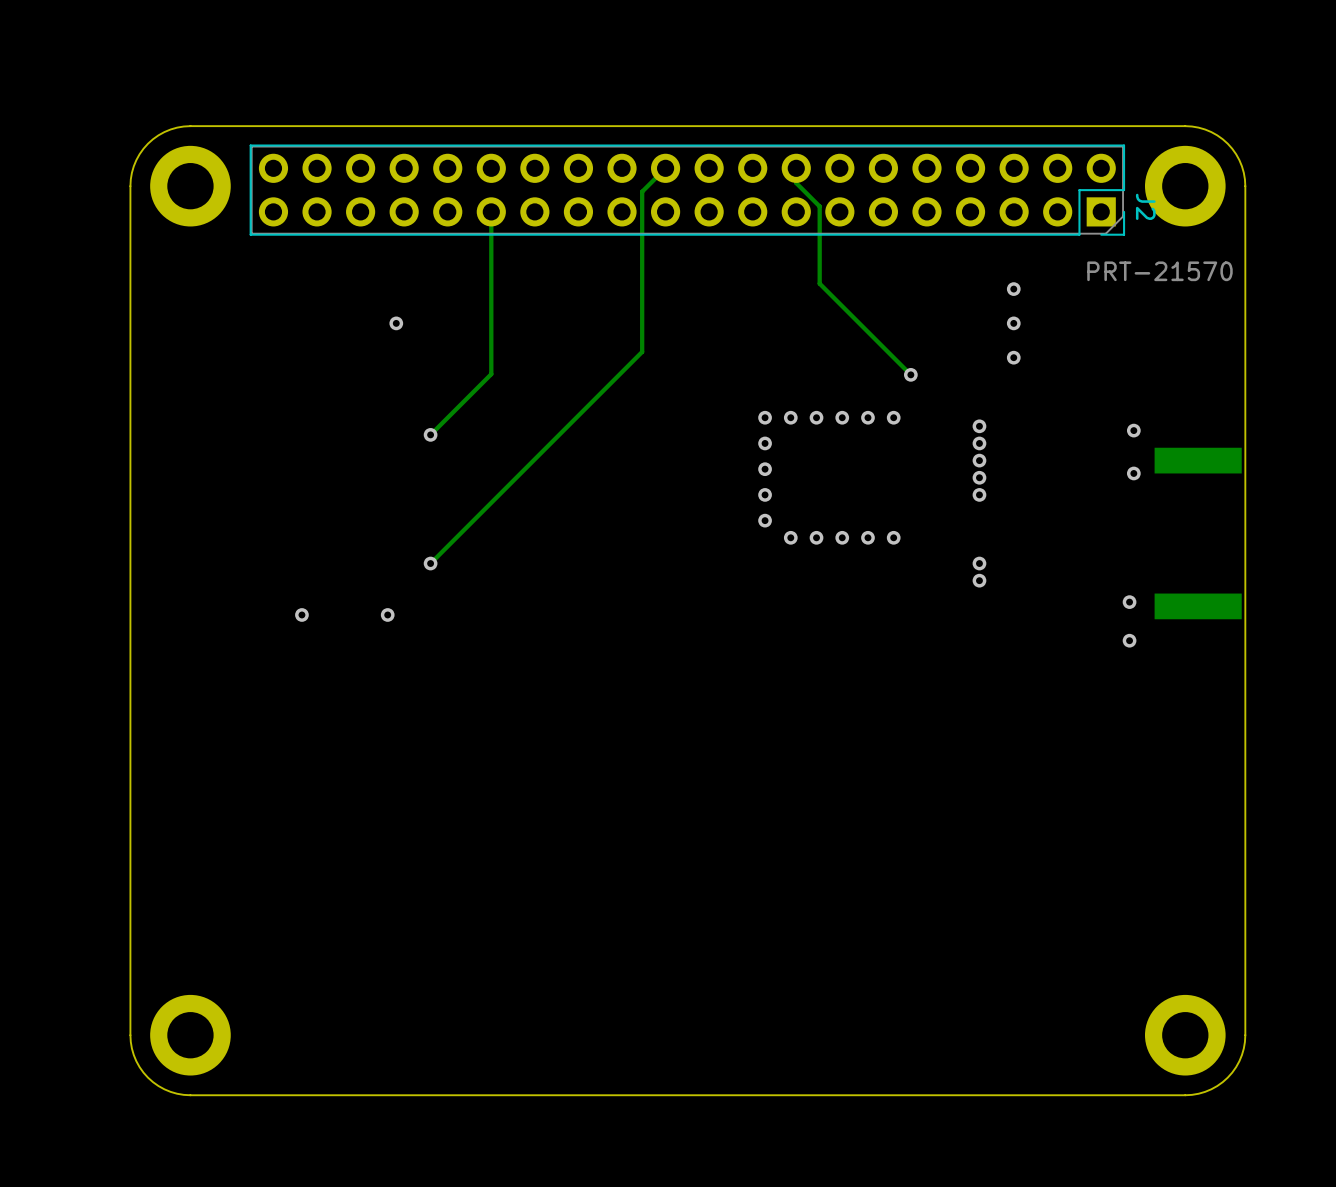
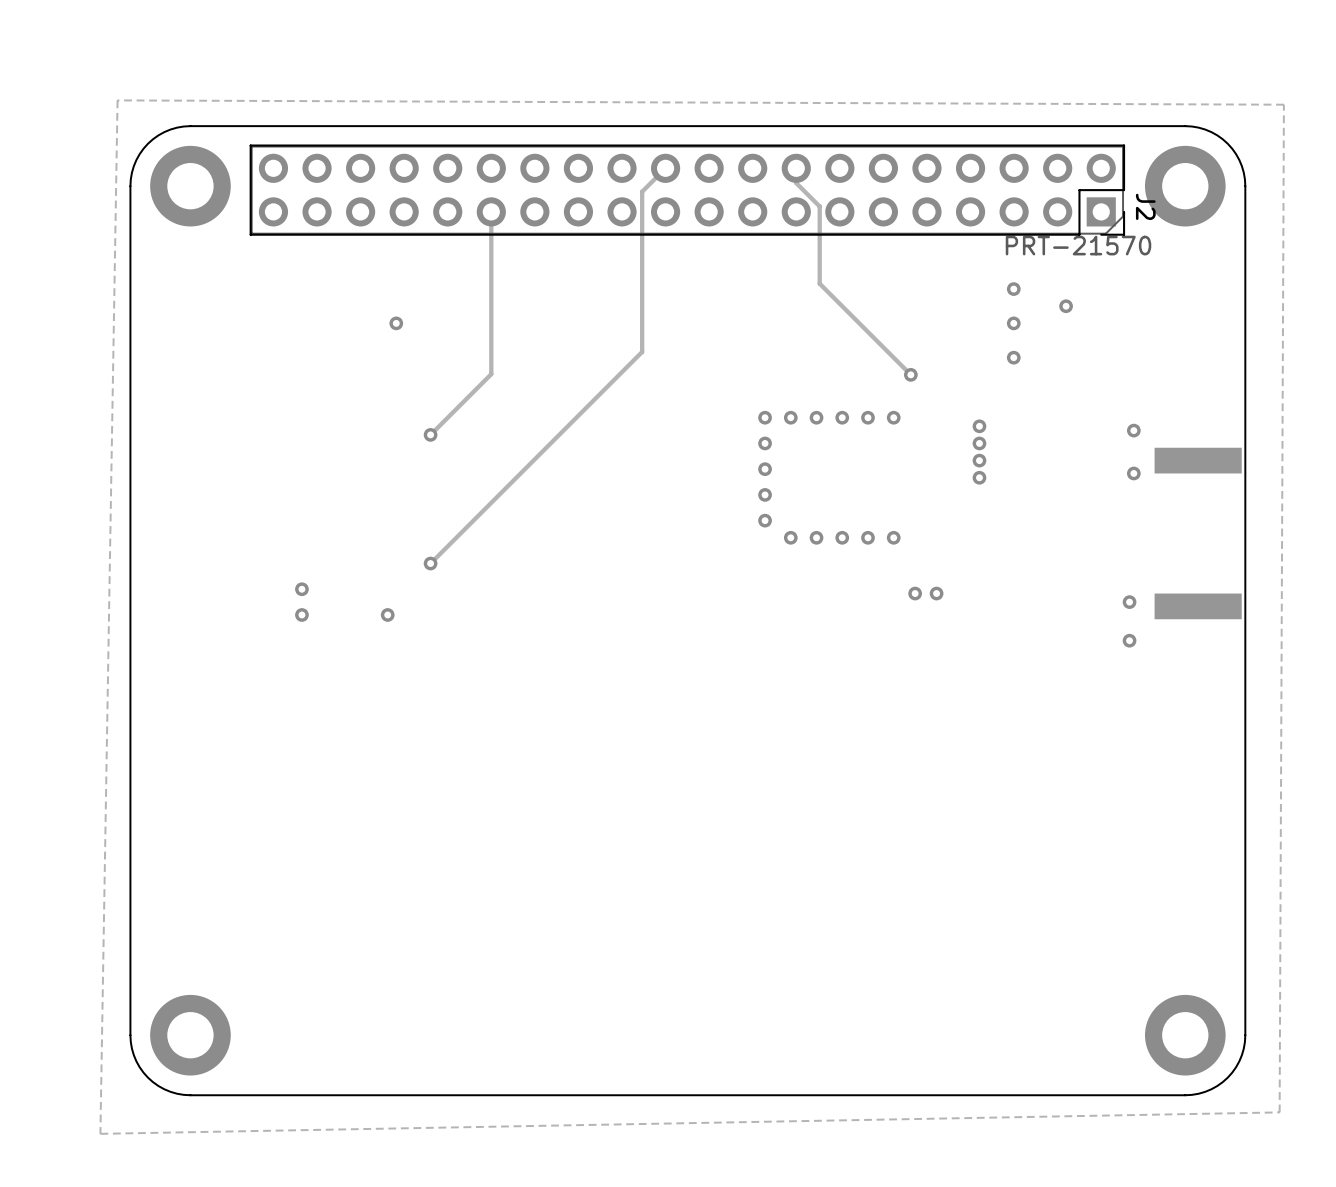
zone outline: none -> (117, 100) (1283, 104) (1279, 1112) (100, 1133) (117, 100)
J2 value position: PRT-21570 (1159, 271) -> PRT-21570 (1078, 245)
via: none -> (1066, 306)
via: (979, 494) -> none
via: (979, 563) -> none
via: (979, 580) -> none
via: none -> (301, 589)
via: none -> (915, 593)
via: none -> (936, 593)

